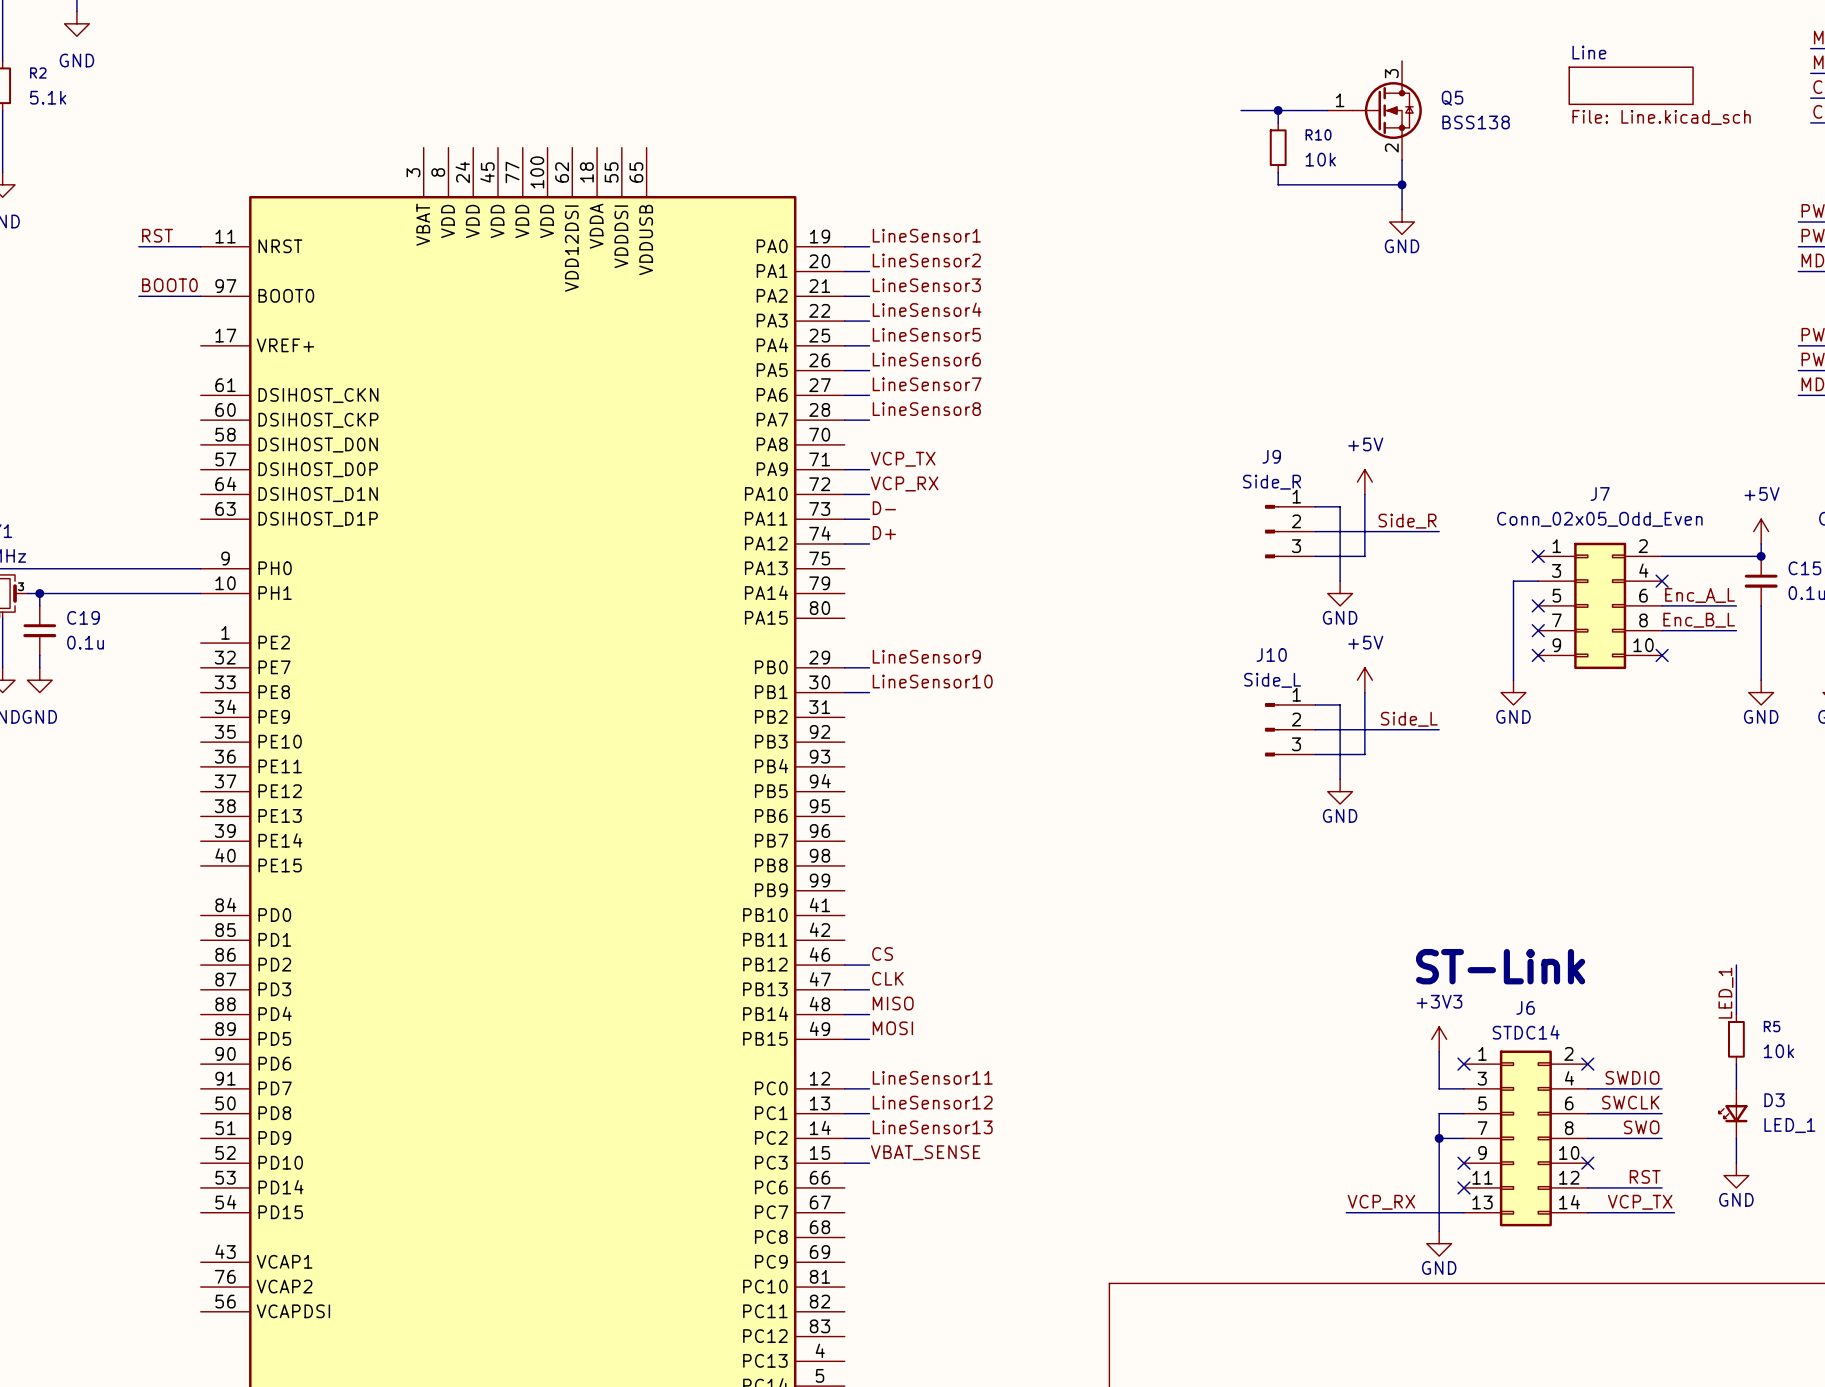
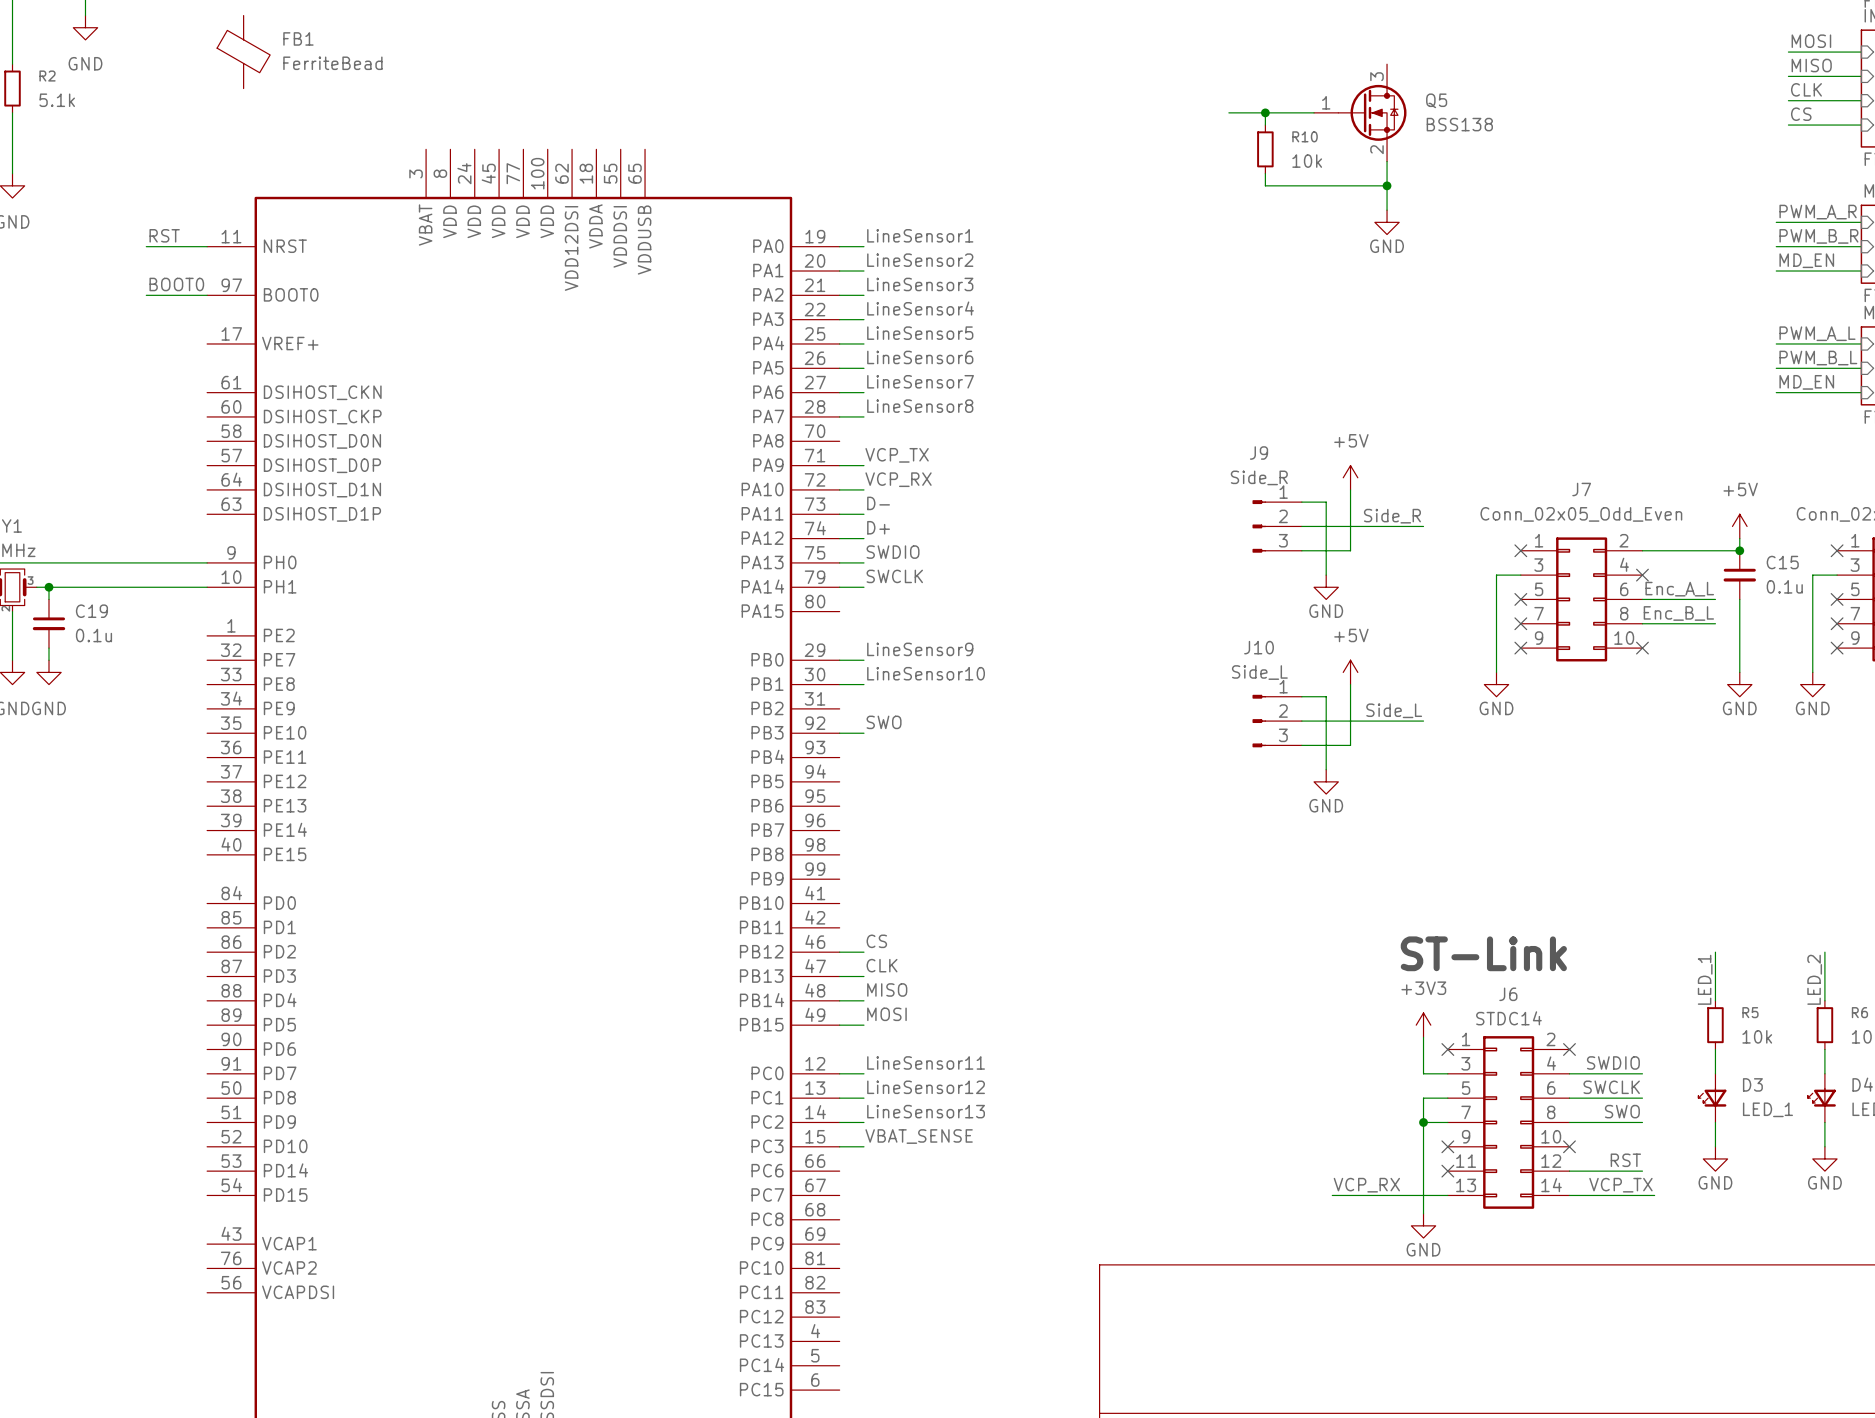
FB1: none -> FerriteBead (243, 52)
sheet Line: File: Line.kicad_sch (1631, 85) -> none
label: none -> SWDIO (893, 552)
wire: none -> (839, 562) (863, 562)
label: none -> SWCLK (894, 576)
wire: none -> (839, 587) (863, 587)
label: none -> SWO (884, 722)
wire: none -> (839, 733) (863, 733)

